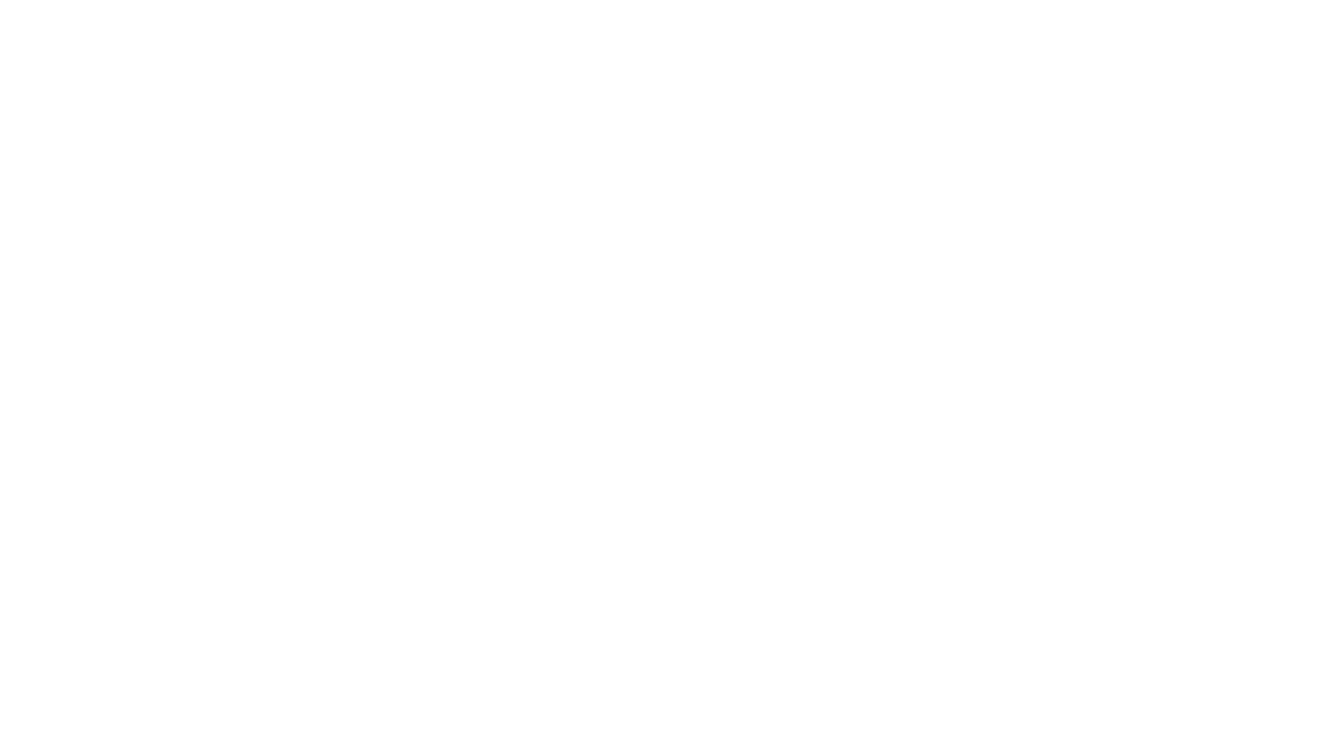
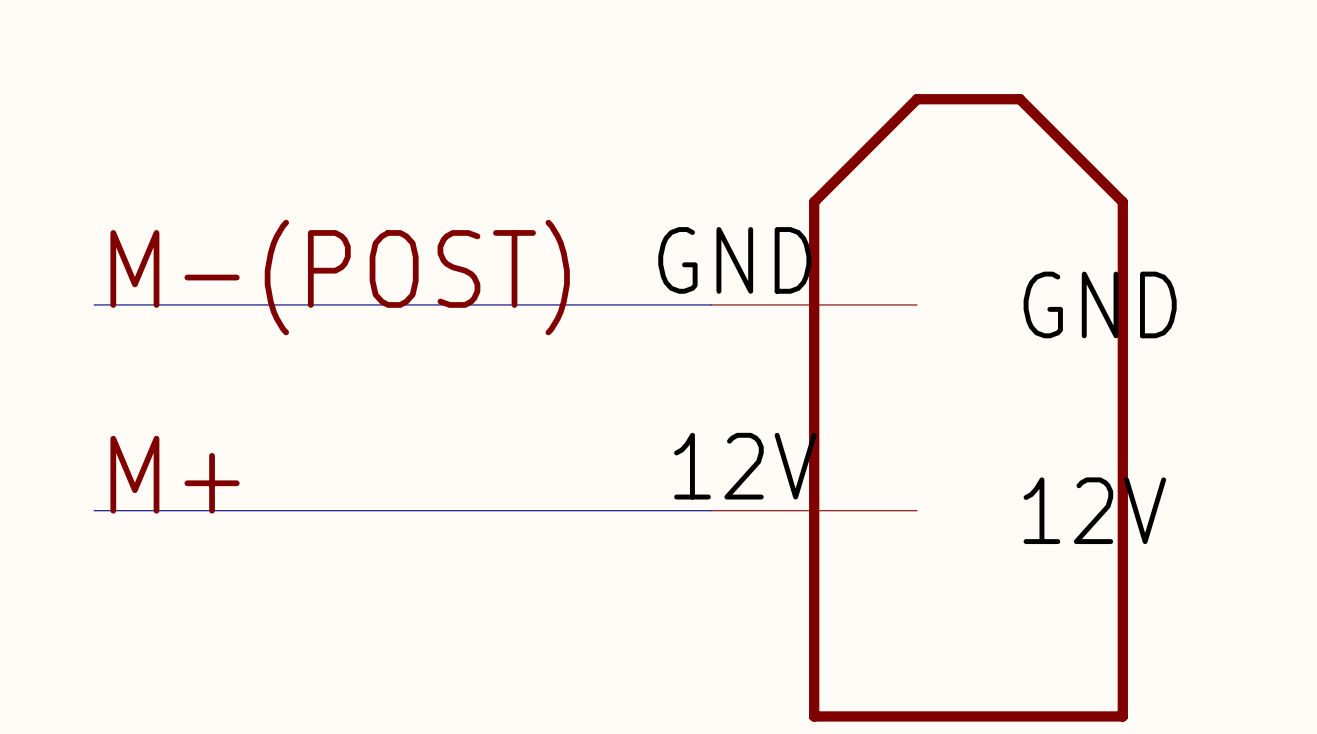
label: none -> M-(POST) (340, 277)
wire: none -> (94, 304) (711, 304)
part: none -> (919, 407)
label: none -> M+ (175, 474)
wire: none -> (94, 510) (711, 510)

